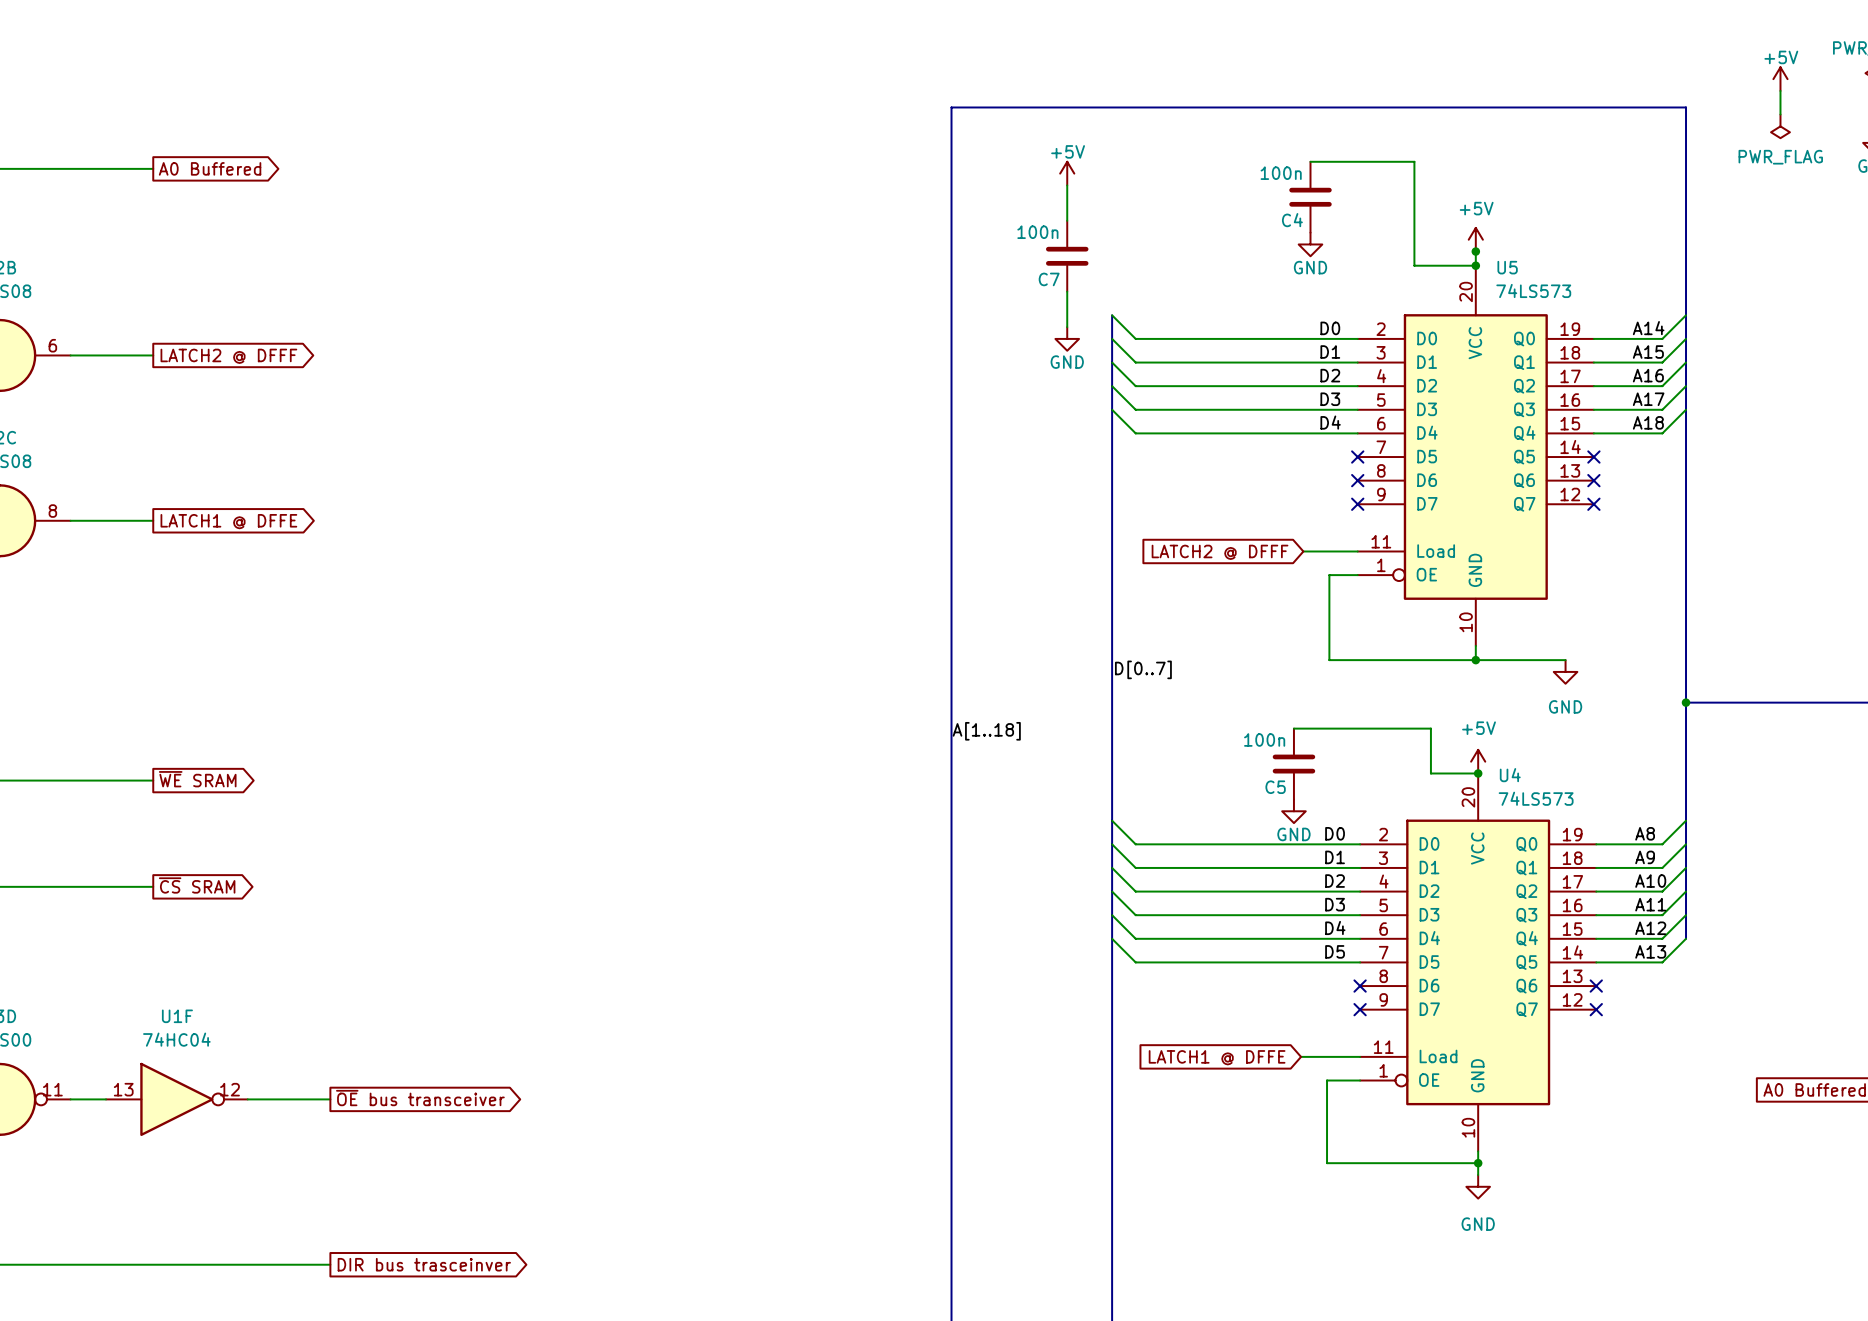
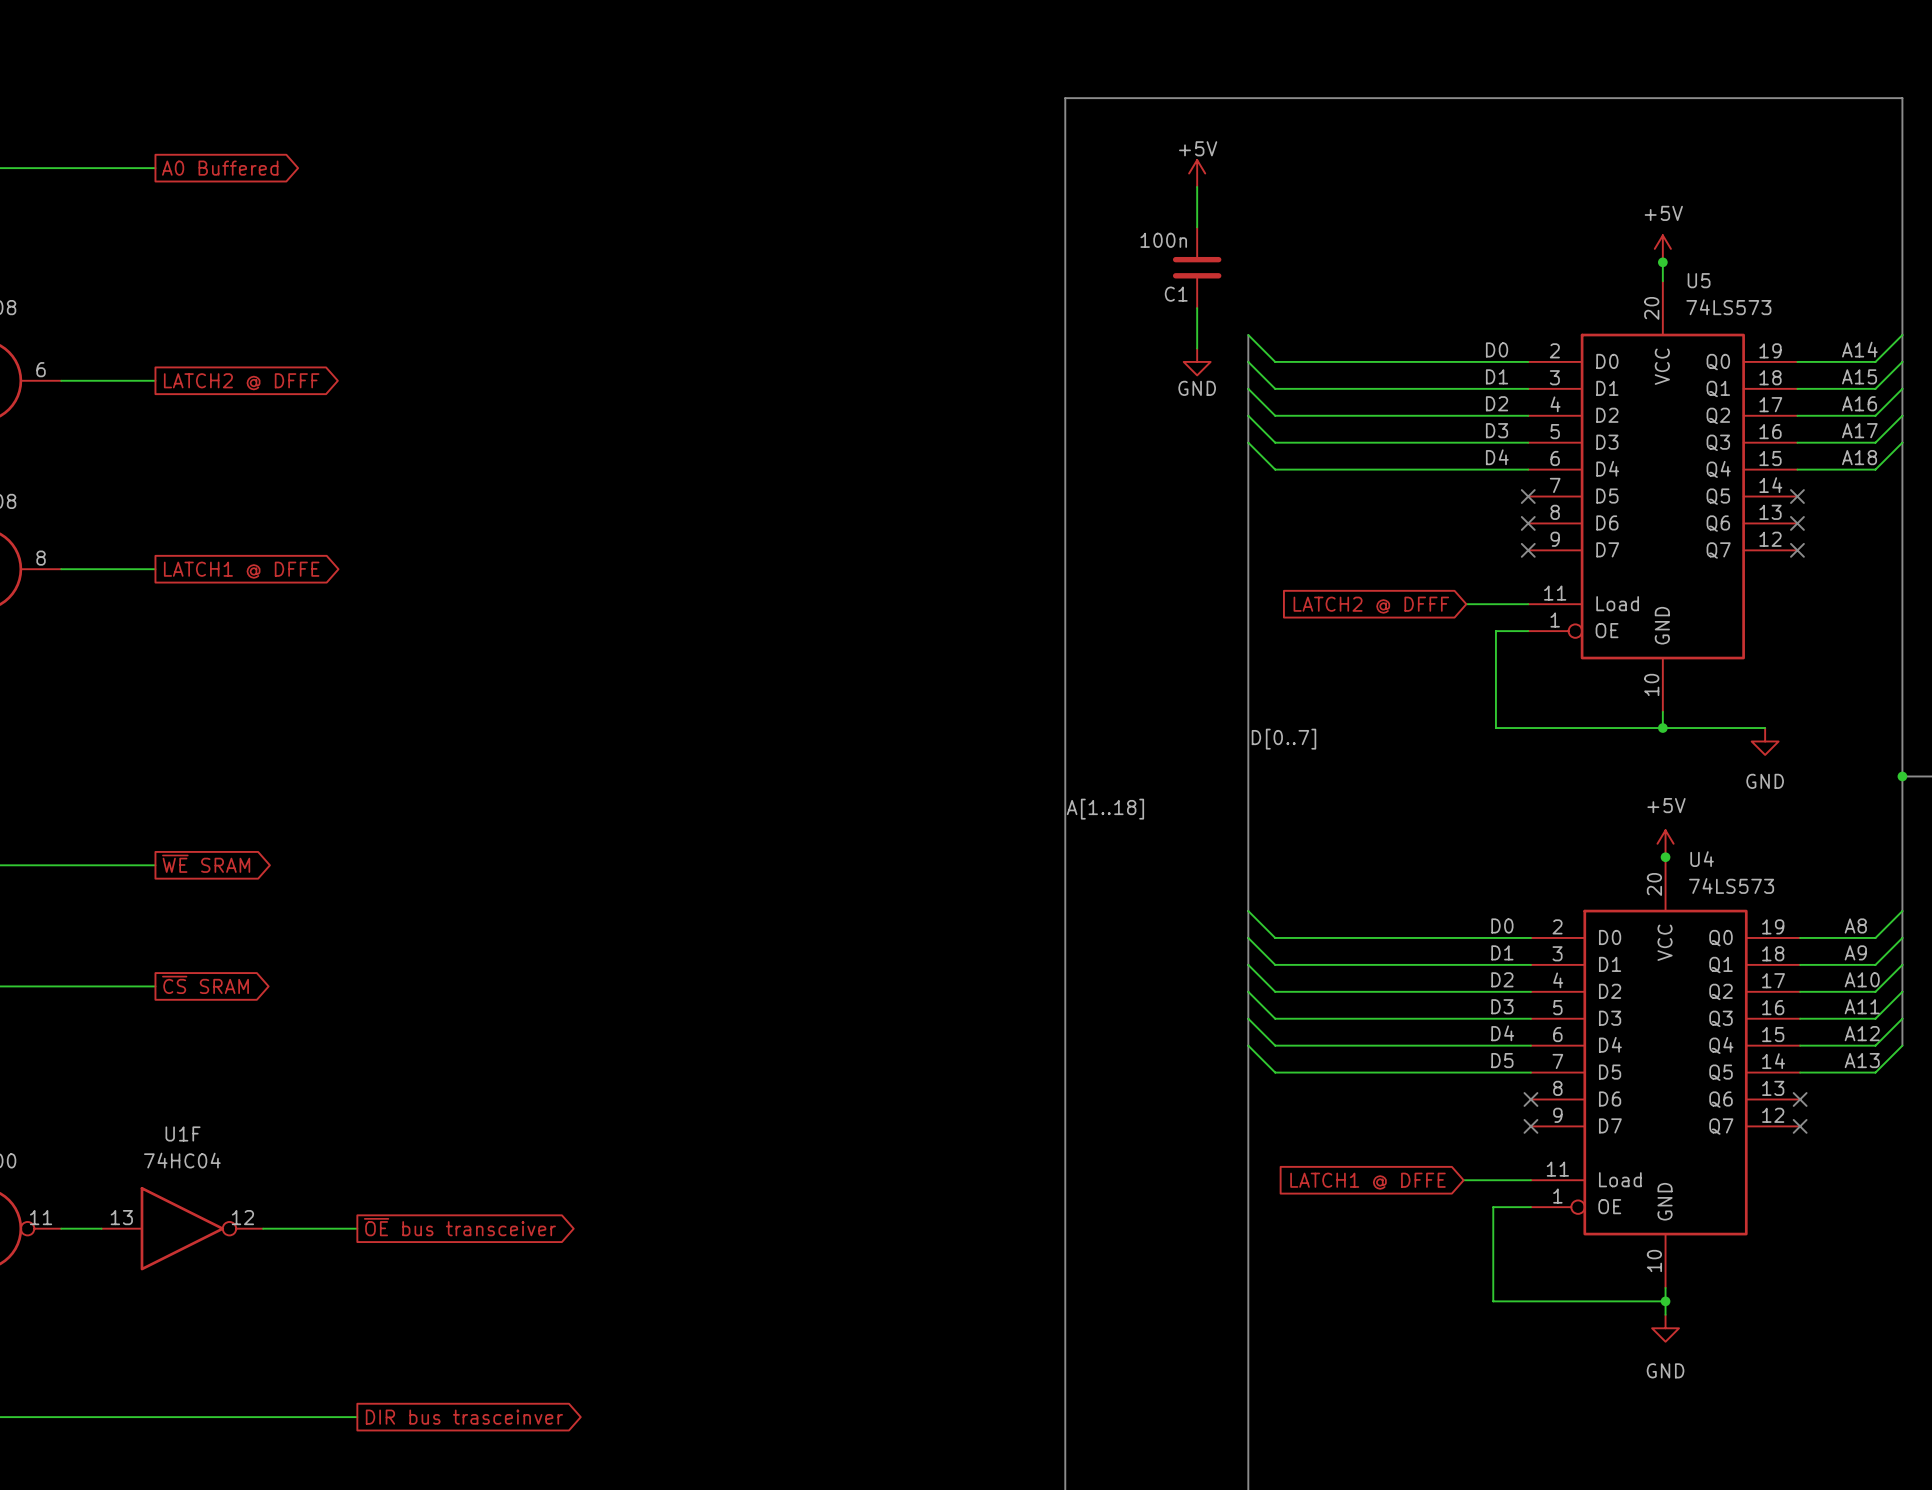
wire: (1310, 161) (1414, 161) (1414, 265) (1475, 265) -> none
C4: 100n (1310, 197) -> none
power symbol: GND (1310, 244) -> none
junction: (1475, 265) -> none
C7 name: C7 (1049, 279) -> C1 (1176, 294)
wire: (1293, 728) (1430, 728) (1430, 773) (1478, 773) -> none
C5: 100n (1293, 764) -> none
power symbol: GND (1293, 811) -> none

